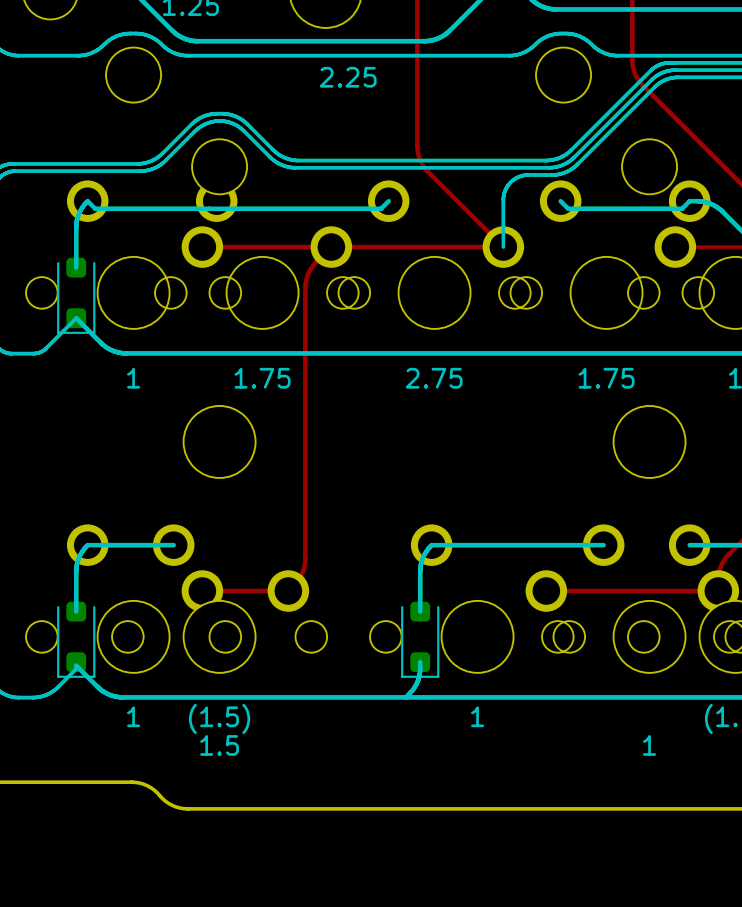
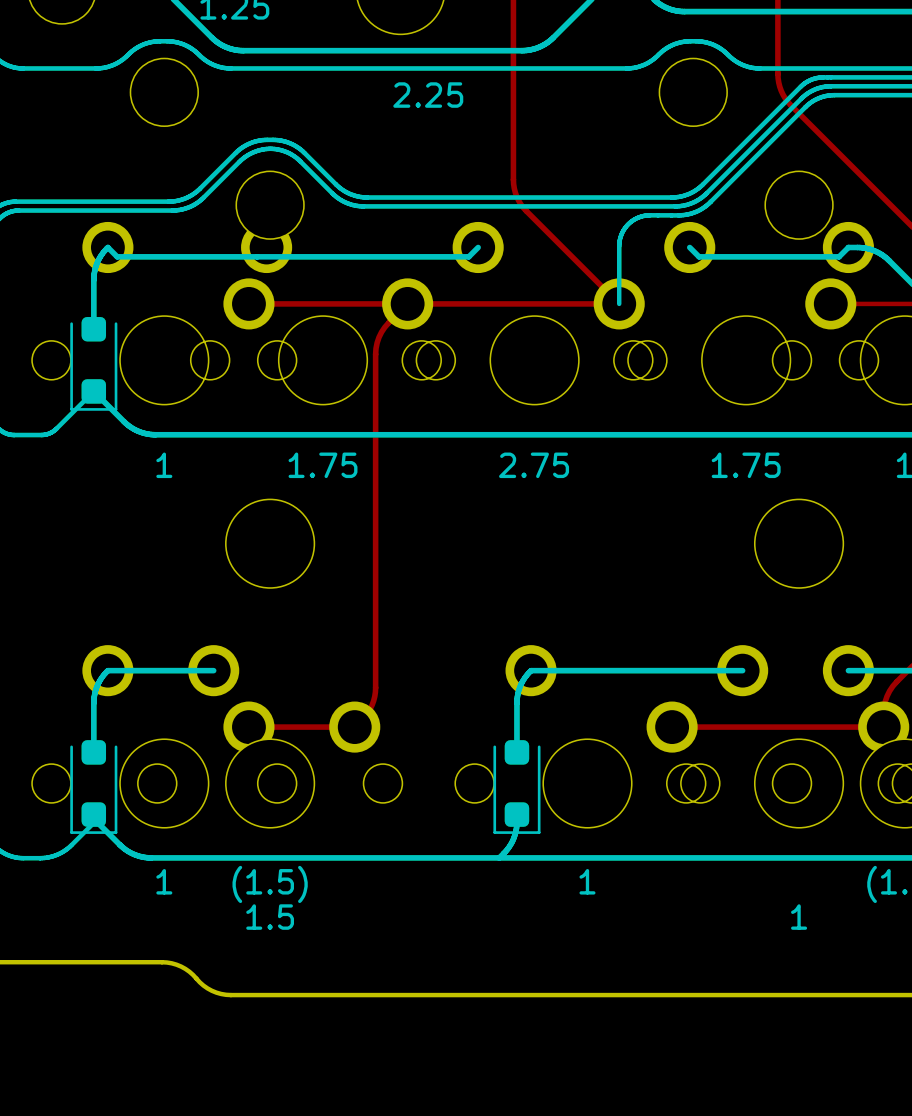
drawing: none -> [81, 317, 107, 342]
drawing: none -> [81, 379, 107, 404]
drawing: none -> [81, 740, 107, 765]
drawing: none -> [504, 740, 530, 765]
drawing: none -> [81, 802, 107, 827]
drawing: none -> [504, 802, 530, 827]

